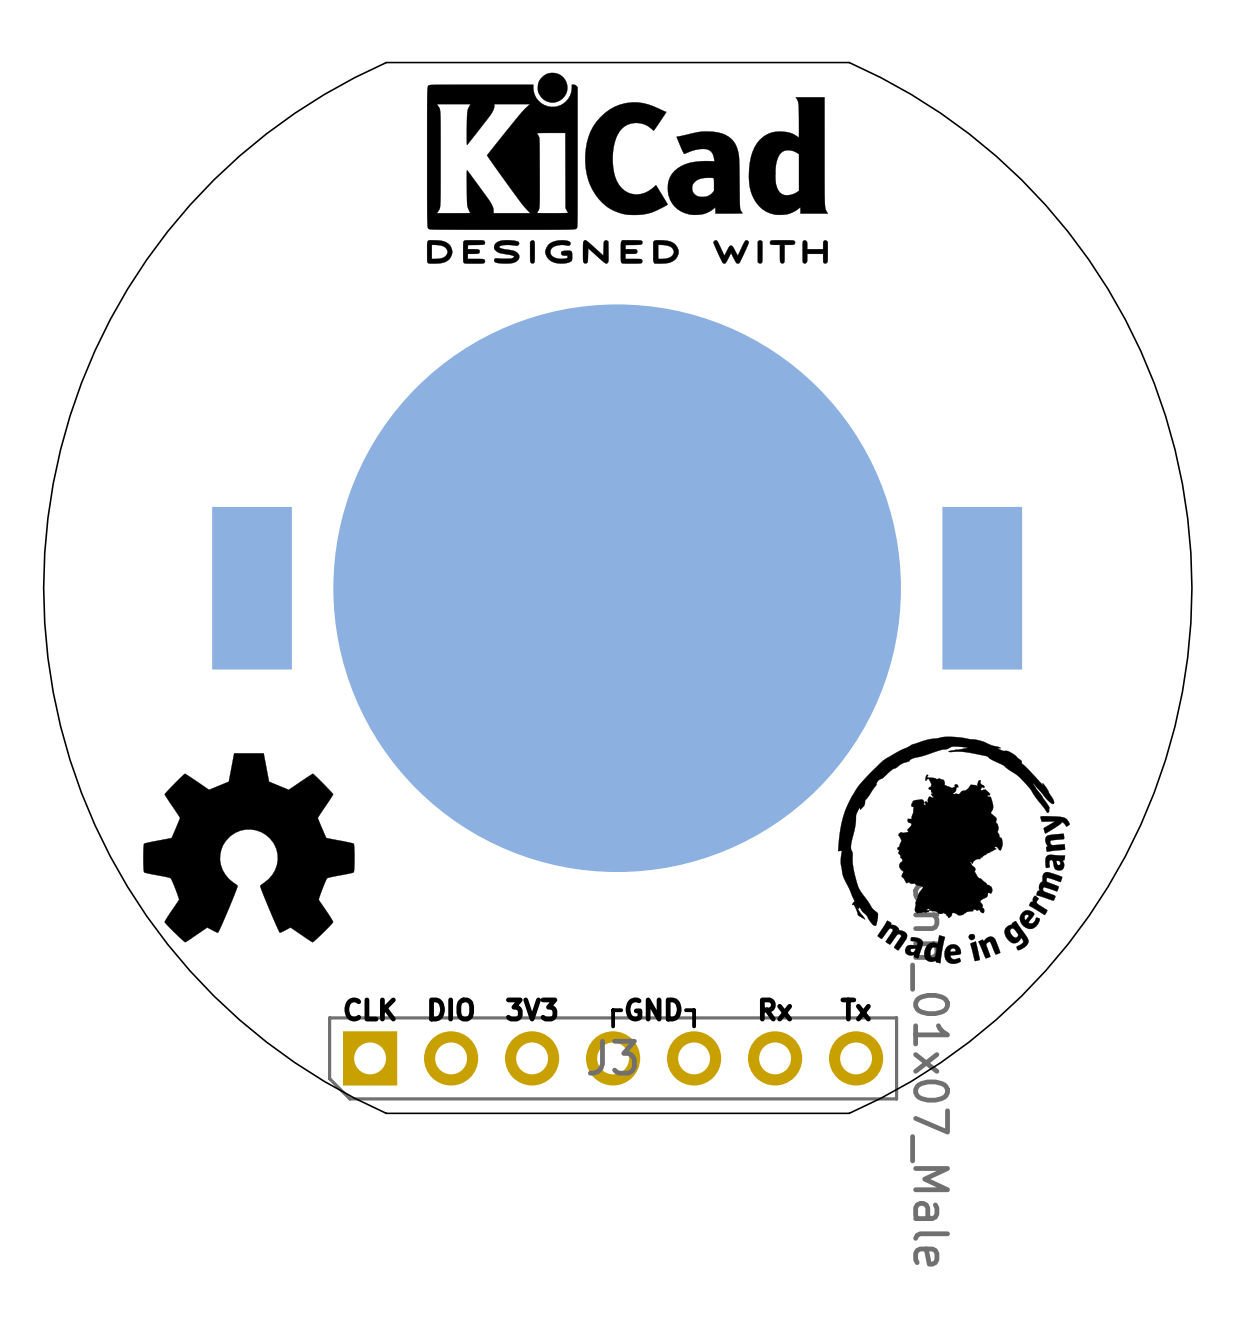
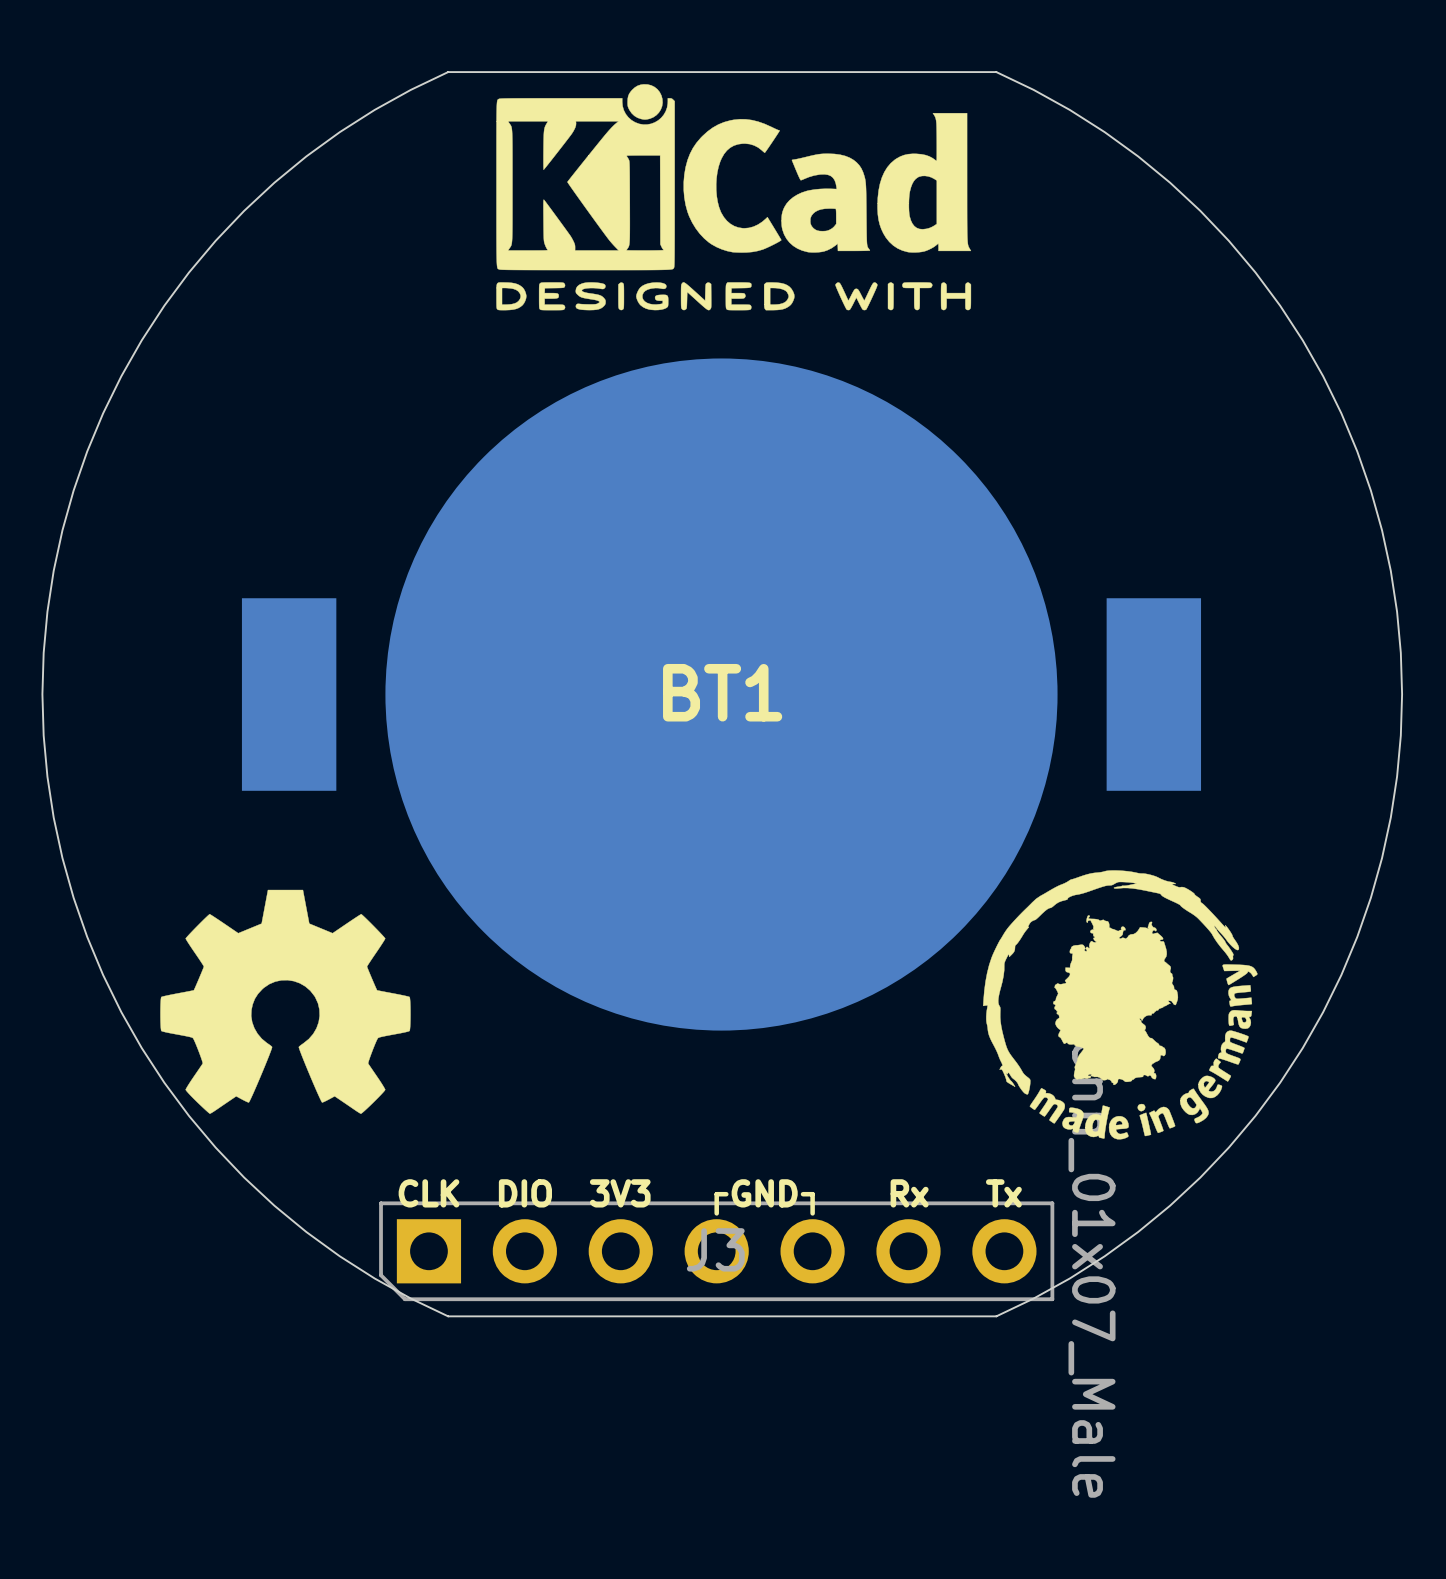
BT1 name: none -> BT1 (722, 692)

